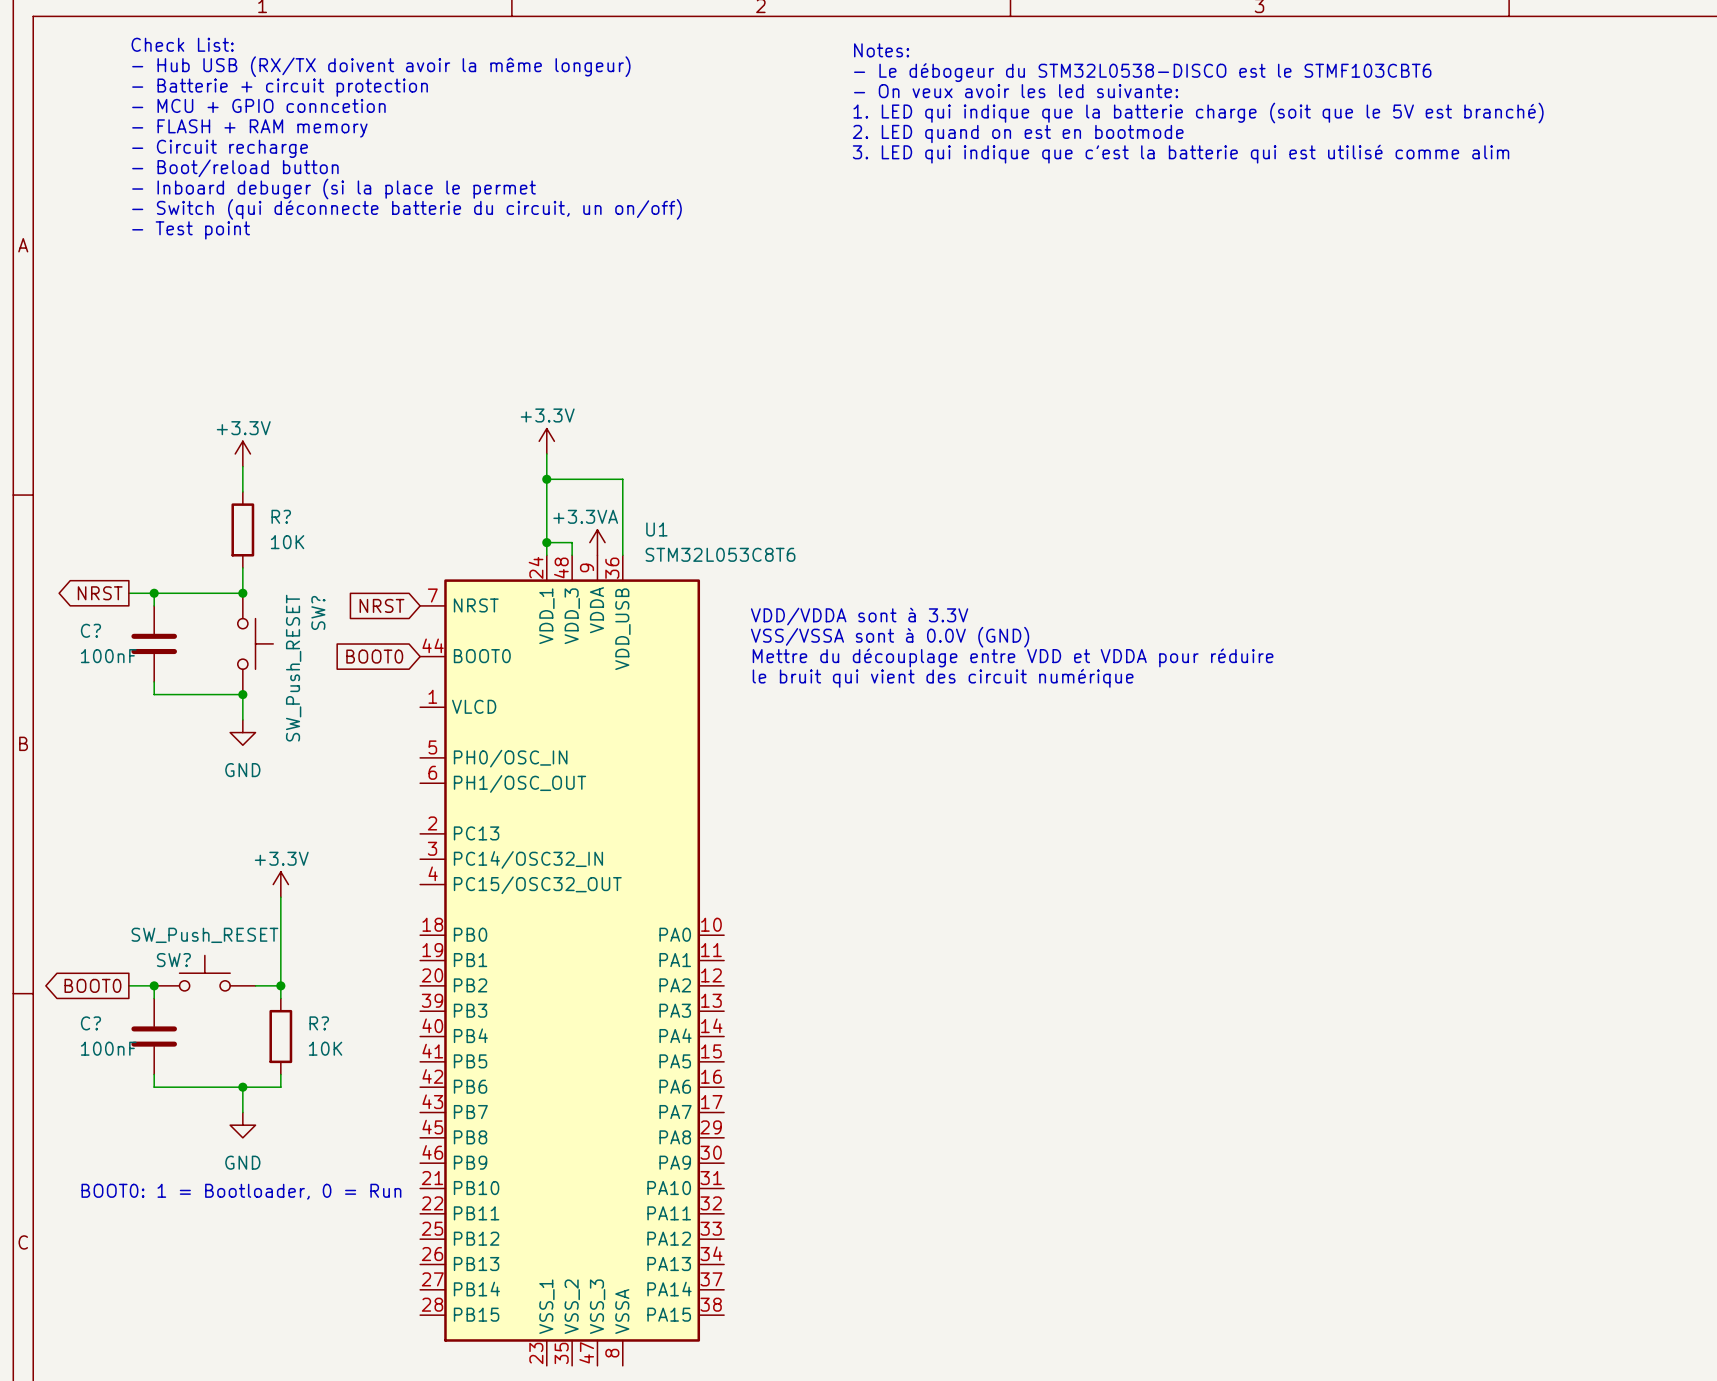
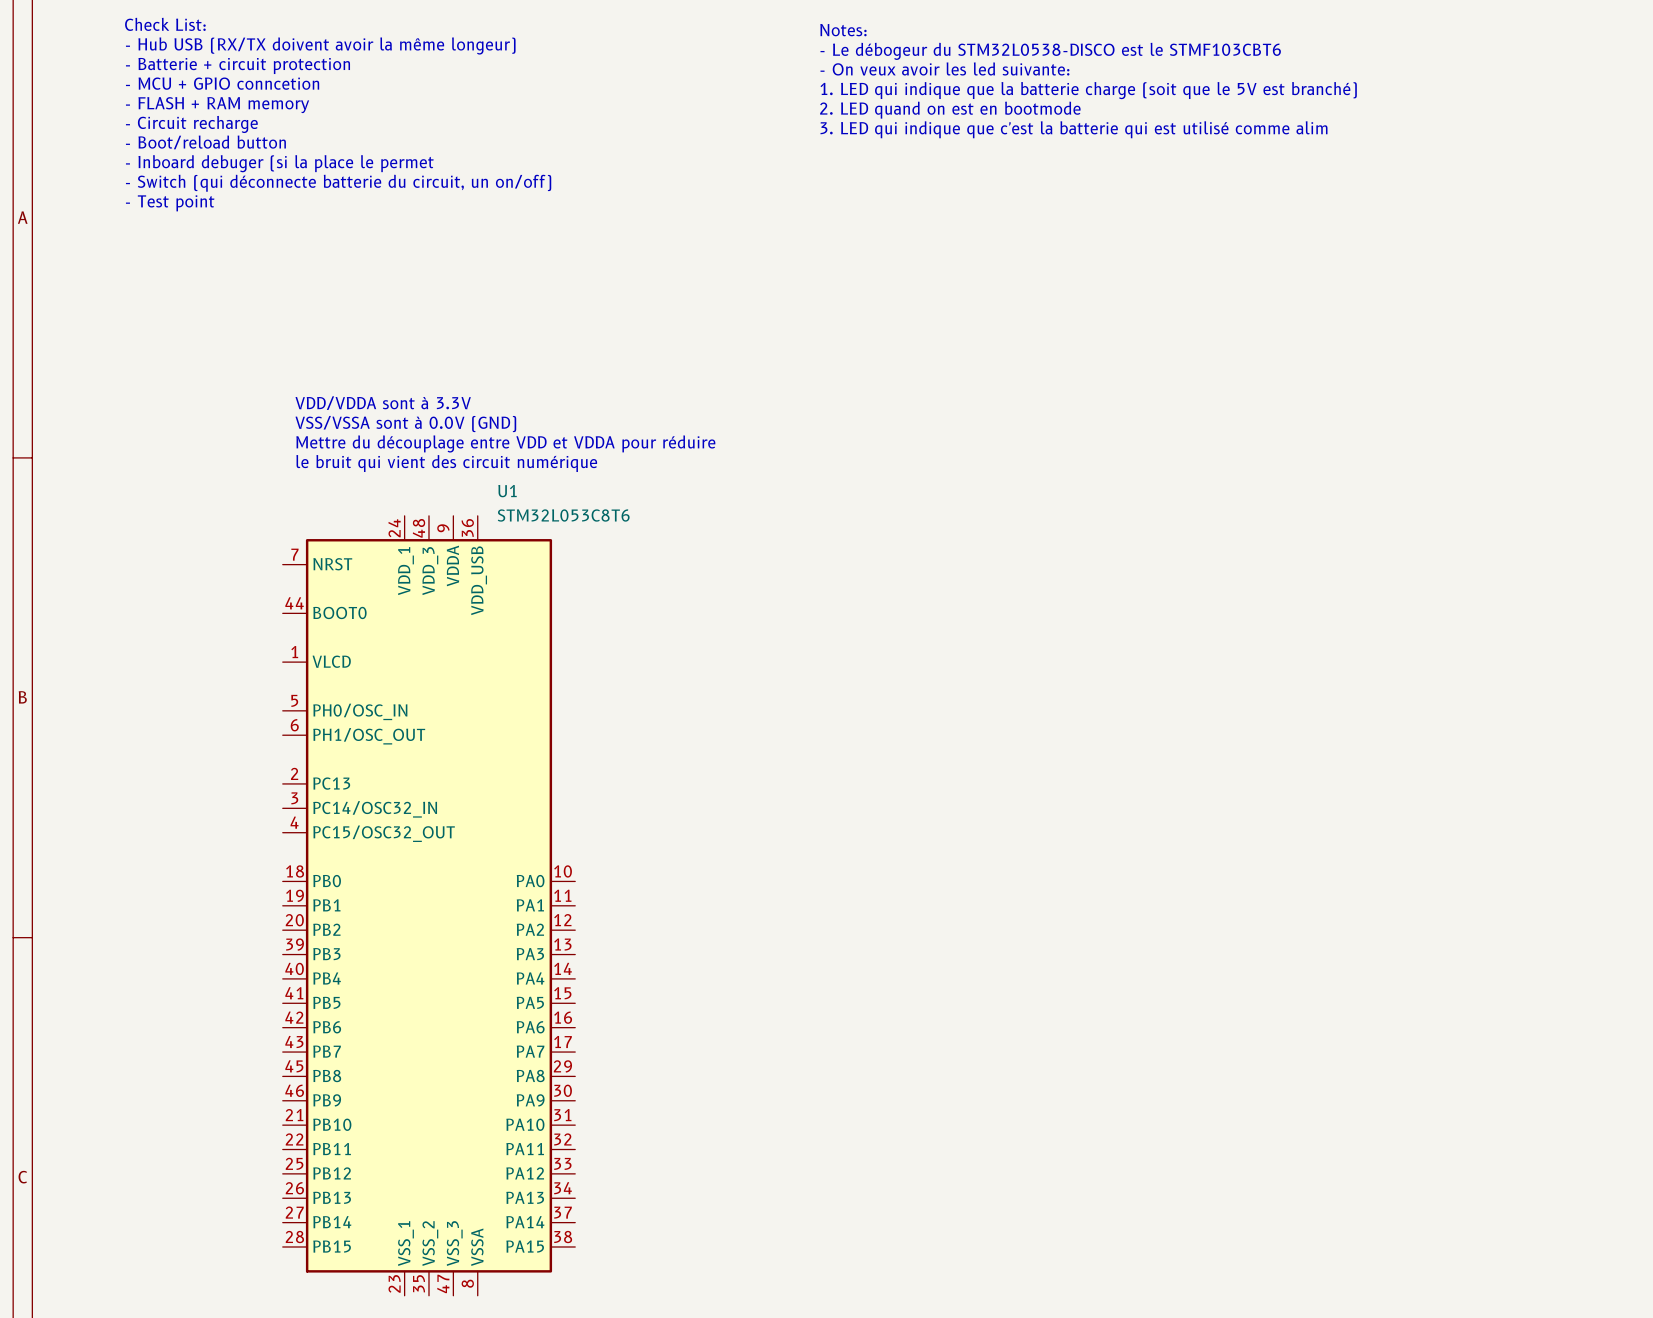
text: none -> VDD/VDDA sont à 3.3V (383, 403)
power symbol: +3.3V (546, 441) -> none
power symbol: +3.3V (242, 453) -> none
wire: (546, 453) (546, 555) -> none
text: none -> VSS/VSSA sont à 0.0V (GND) (405, 424)
wire: (242, 466) (242, 491) -> none
wire: (546, 479) (622, 479) (622, 555) -> none
junction: (546, 479) -> none
text: none -> Mettre du découplage entre VDD et VDDA pour réduire (505, 443)
text: none -> le bruit qui vient des circuit numérique (446, 463)
R?: 10K (242, 529) -> none
wire: (546, 542) (572, 542) (572, 555) -> none
junction: (546, 542) -> none
power symbol: +3.3VA (597, 542) -> none
wire: (242, 567) (242, 593) (128, 593) -> none
global label: NRST (100, 593) -> none
wire: (154, 593) (154, 605) -> none
junction: (154, 593) -> none
junction: (242, 593) -> none
global label: NRST (381, 605) -> none
text: VDD/VDDA sont à 3.3V (859, 616) -> none
text: VSS/VSSA sont à 0.0V (GND) (890, 637) -> none
C?: 100nF (154, 643) -> none
SW?: SW_Push_RESET (255, 643) -> none
global label: BOOT0 (374, 656) -> none
text: Mettre du découplage entre VDD et VDDA pour réduire (1013, 657) -> none
text: le bruit qui vient des circuit numérique (943, 678) -> none
wire: (154, 681) (154, 694) (242, 694) (242, 719) -> none
junction: (242, 694) -> none
power symbol: GND (242, 732) -> none
power symbol: +3.3V (280, 884) -> none
wire: (280, 897) (280, 998) -> none
U1 position: (572, 960) -> (428, 905)
SW?: SW_Push_RESET (204, 973) -> none
global label: BOOT0 (92, 985) -> none
wire: (128, 985) (154, 985) (154, 998) -> none
junction: (154, 985) -> none
wire: (255, 985) (280, 985) -> none
junction: (280, 985) -> none
C?: 100nF (154, 1036) -> none
R?: 10K (280, 1036) -> none
wire: (154, 1074) (154, 1087) (280, 1087) (280, 1074) -> none
wire: (242, 1087) (242, 1112) -> none
junction: (242, 1087) -> none
power symbol: GND (242, 1125) -> none
text: BOOT0: 1 = Bootloader, 0 = Run (241, 1191) -> none

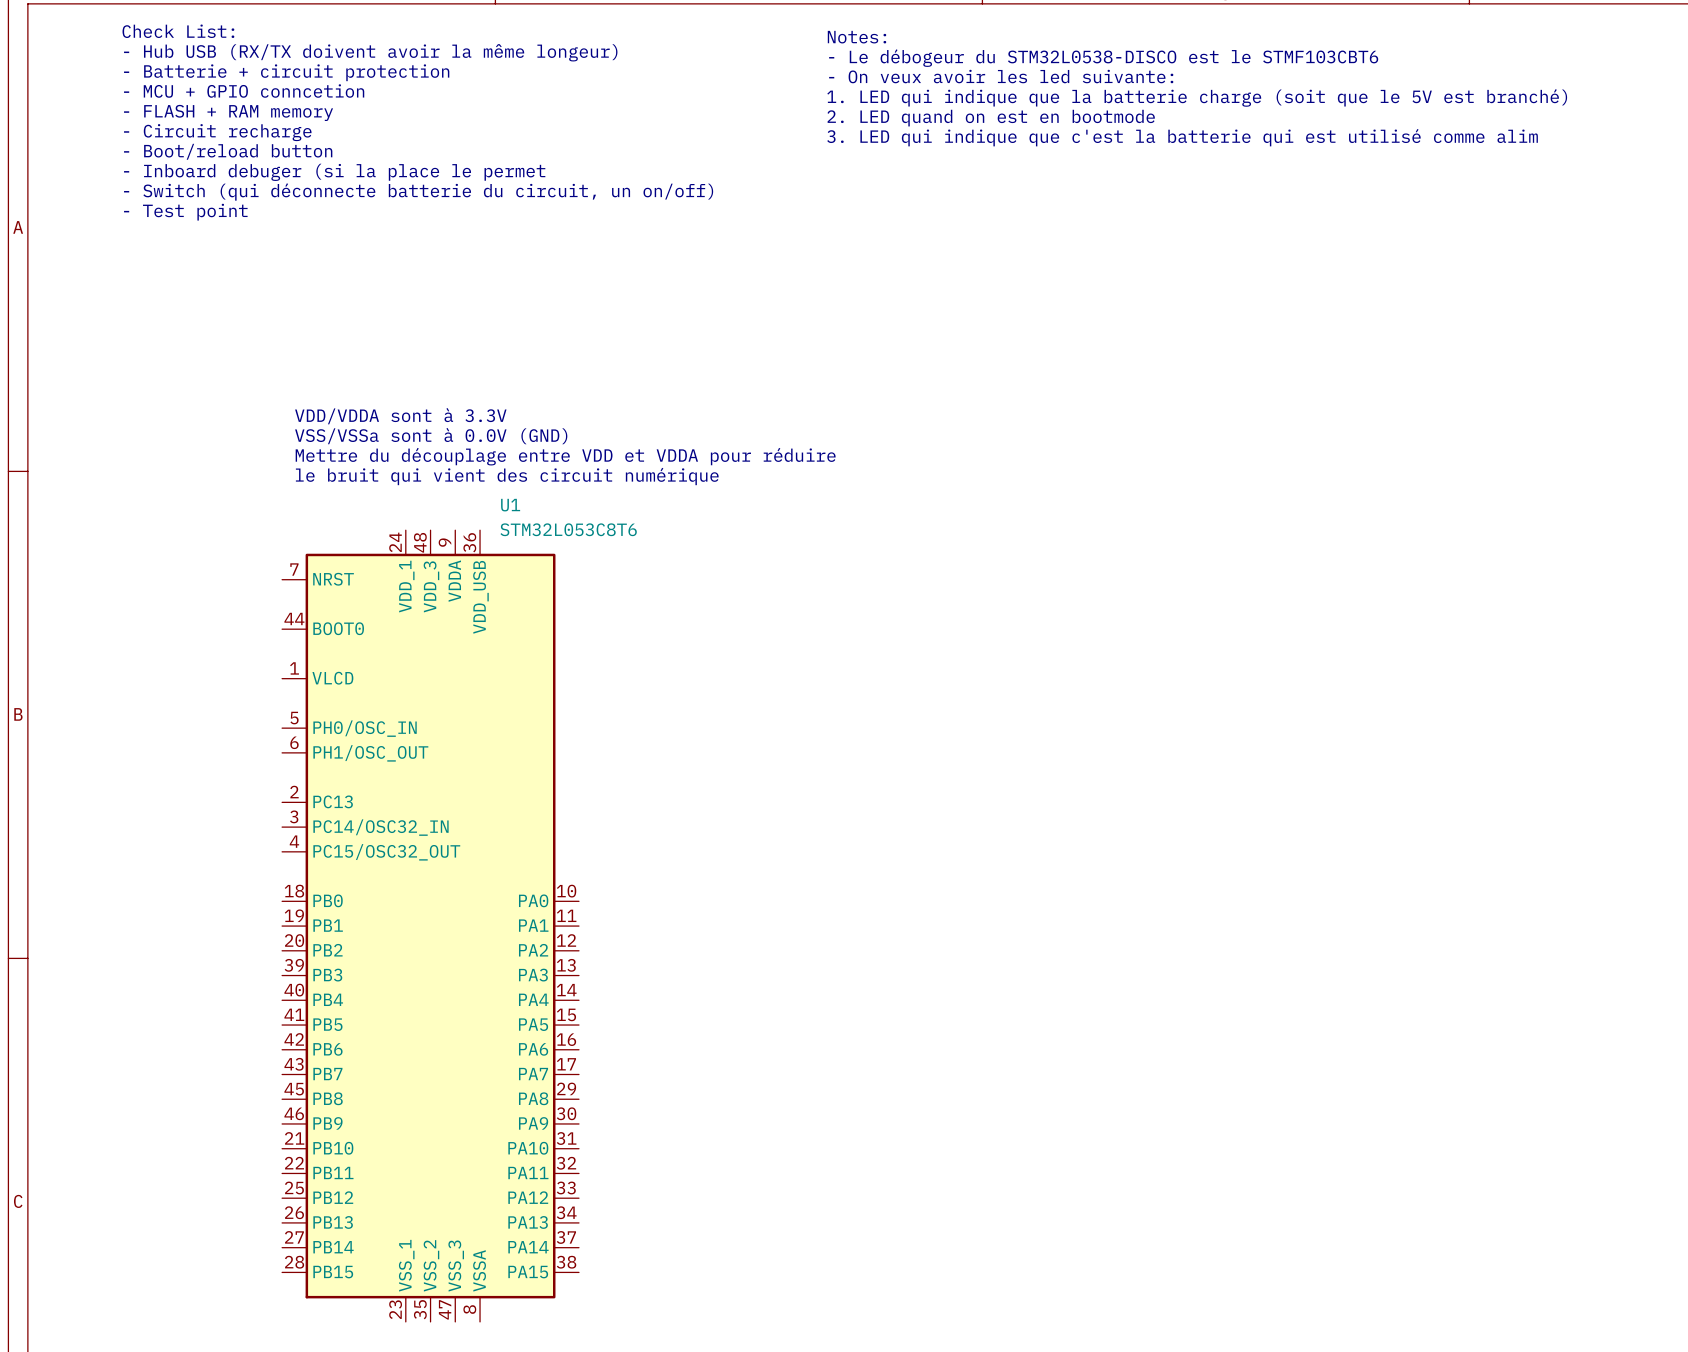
text: VSS/VSSA sont à 0.0V (GND) (405, 424) -> VSS/VSSa sont à 0.0V (GND) (431, 436)

